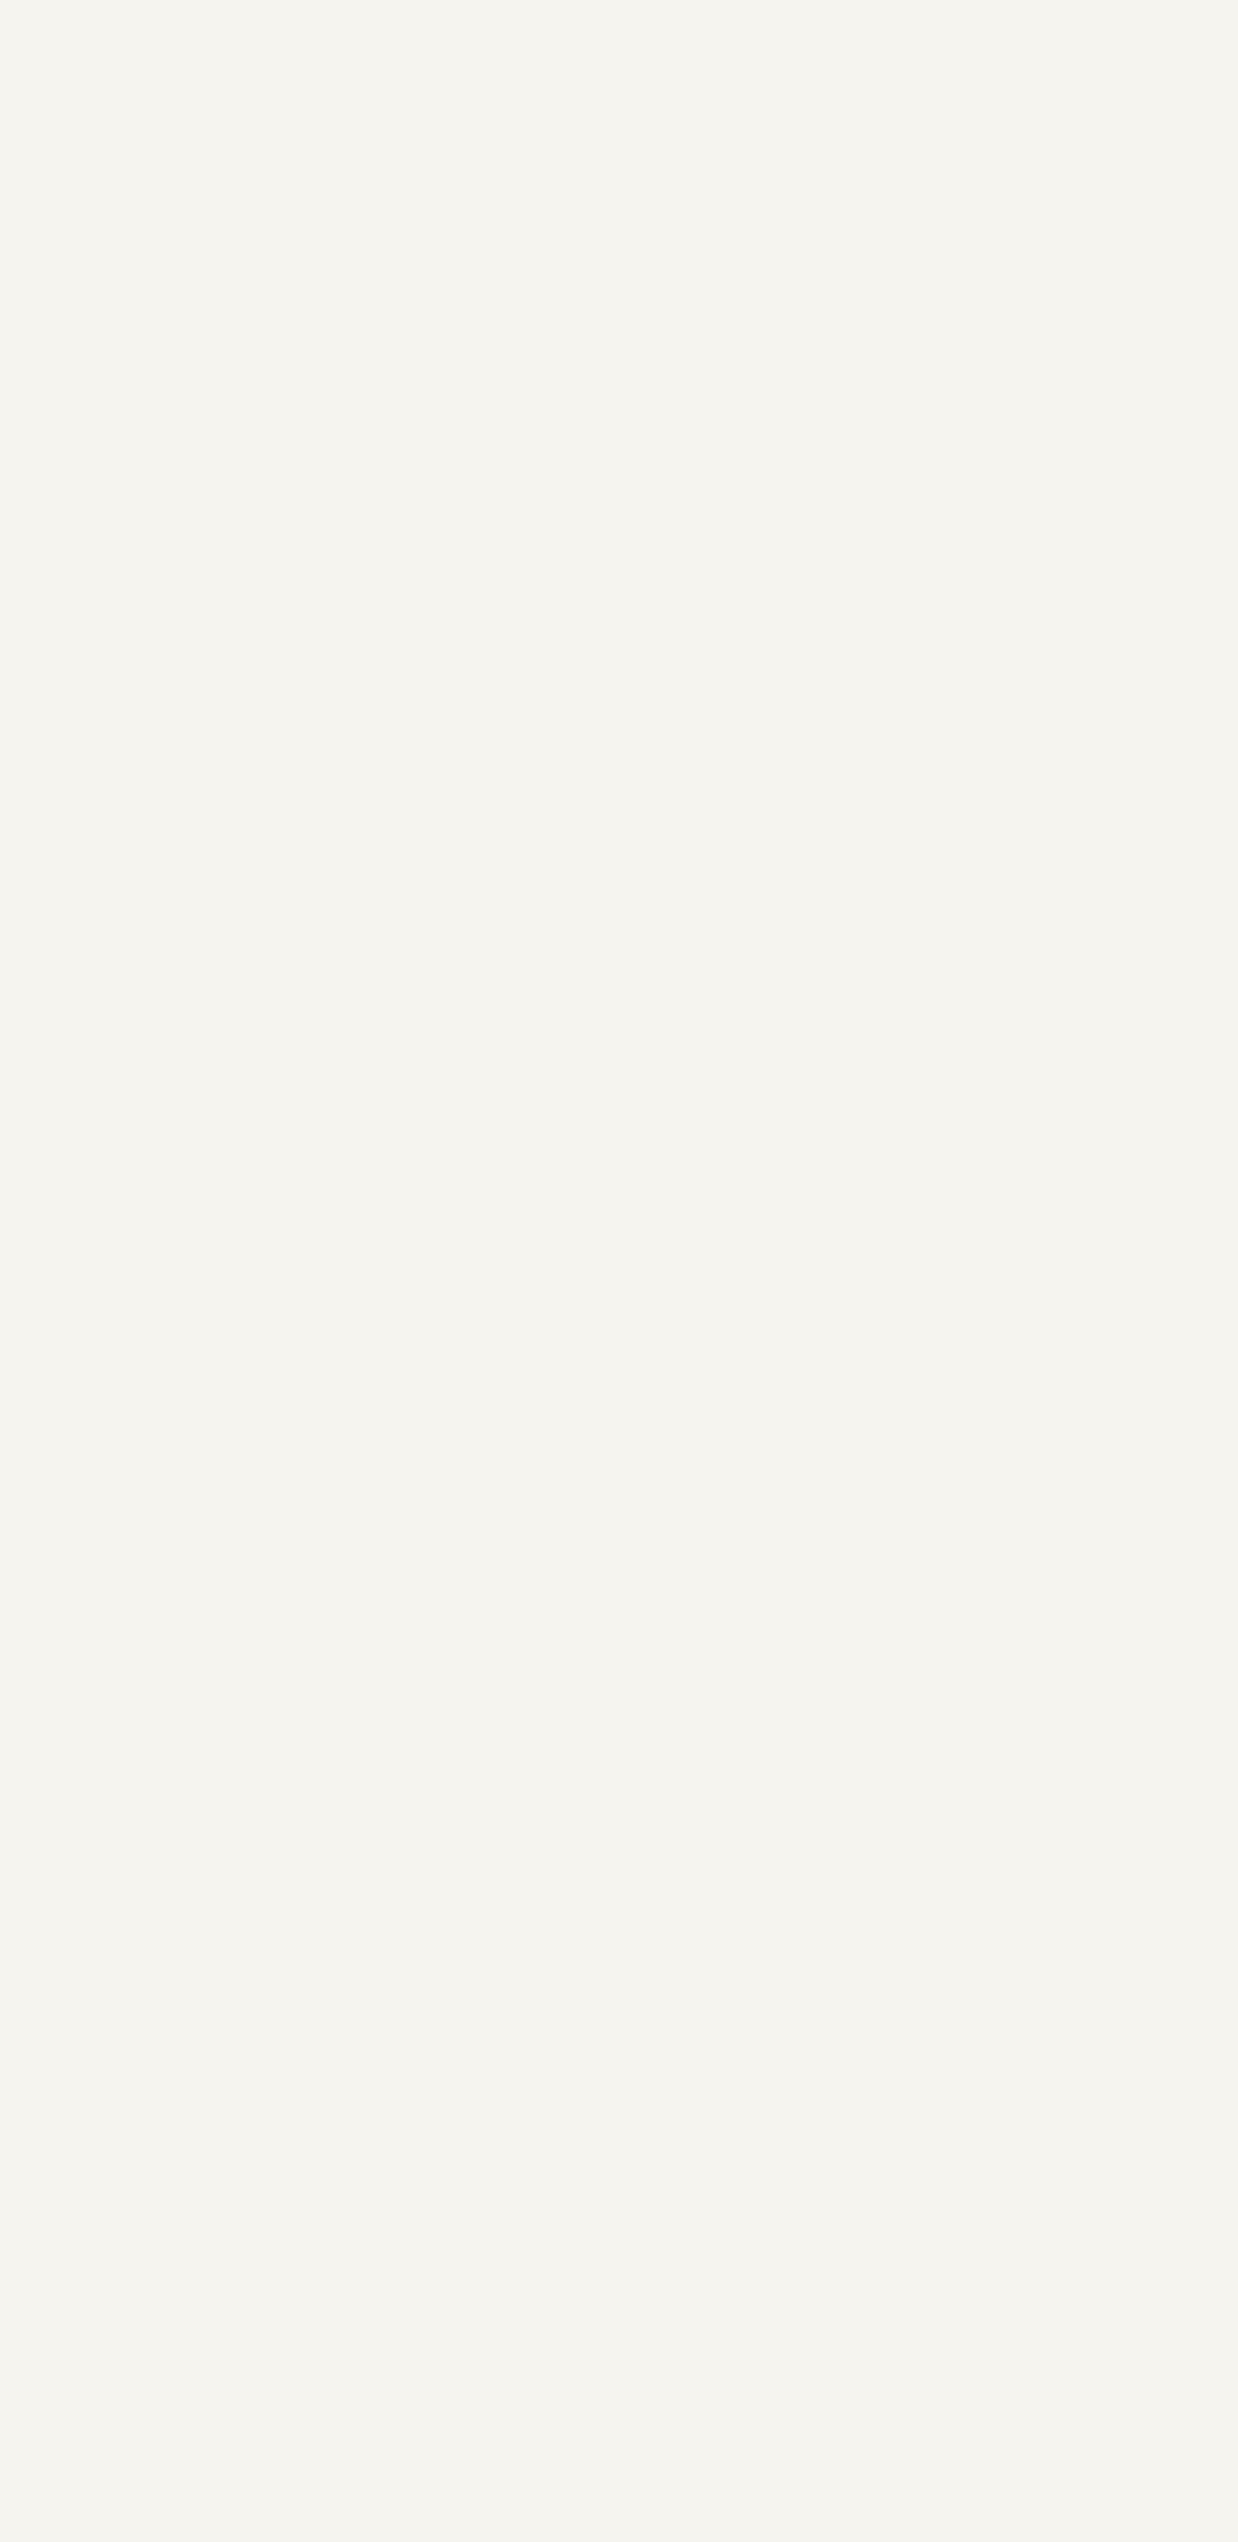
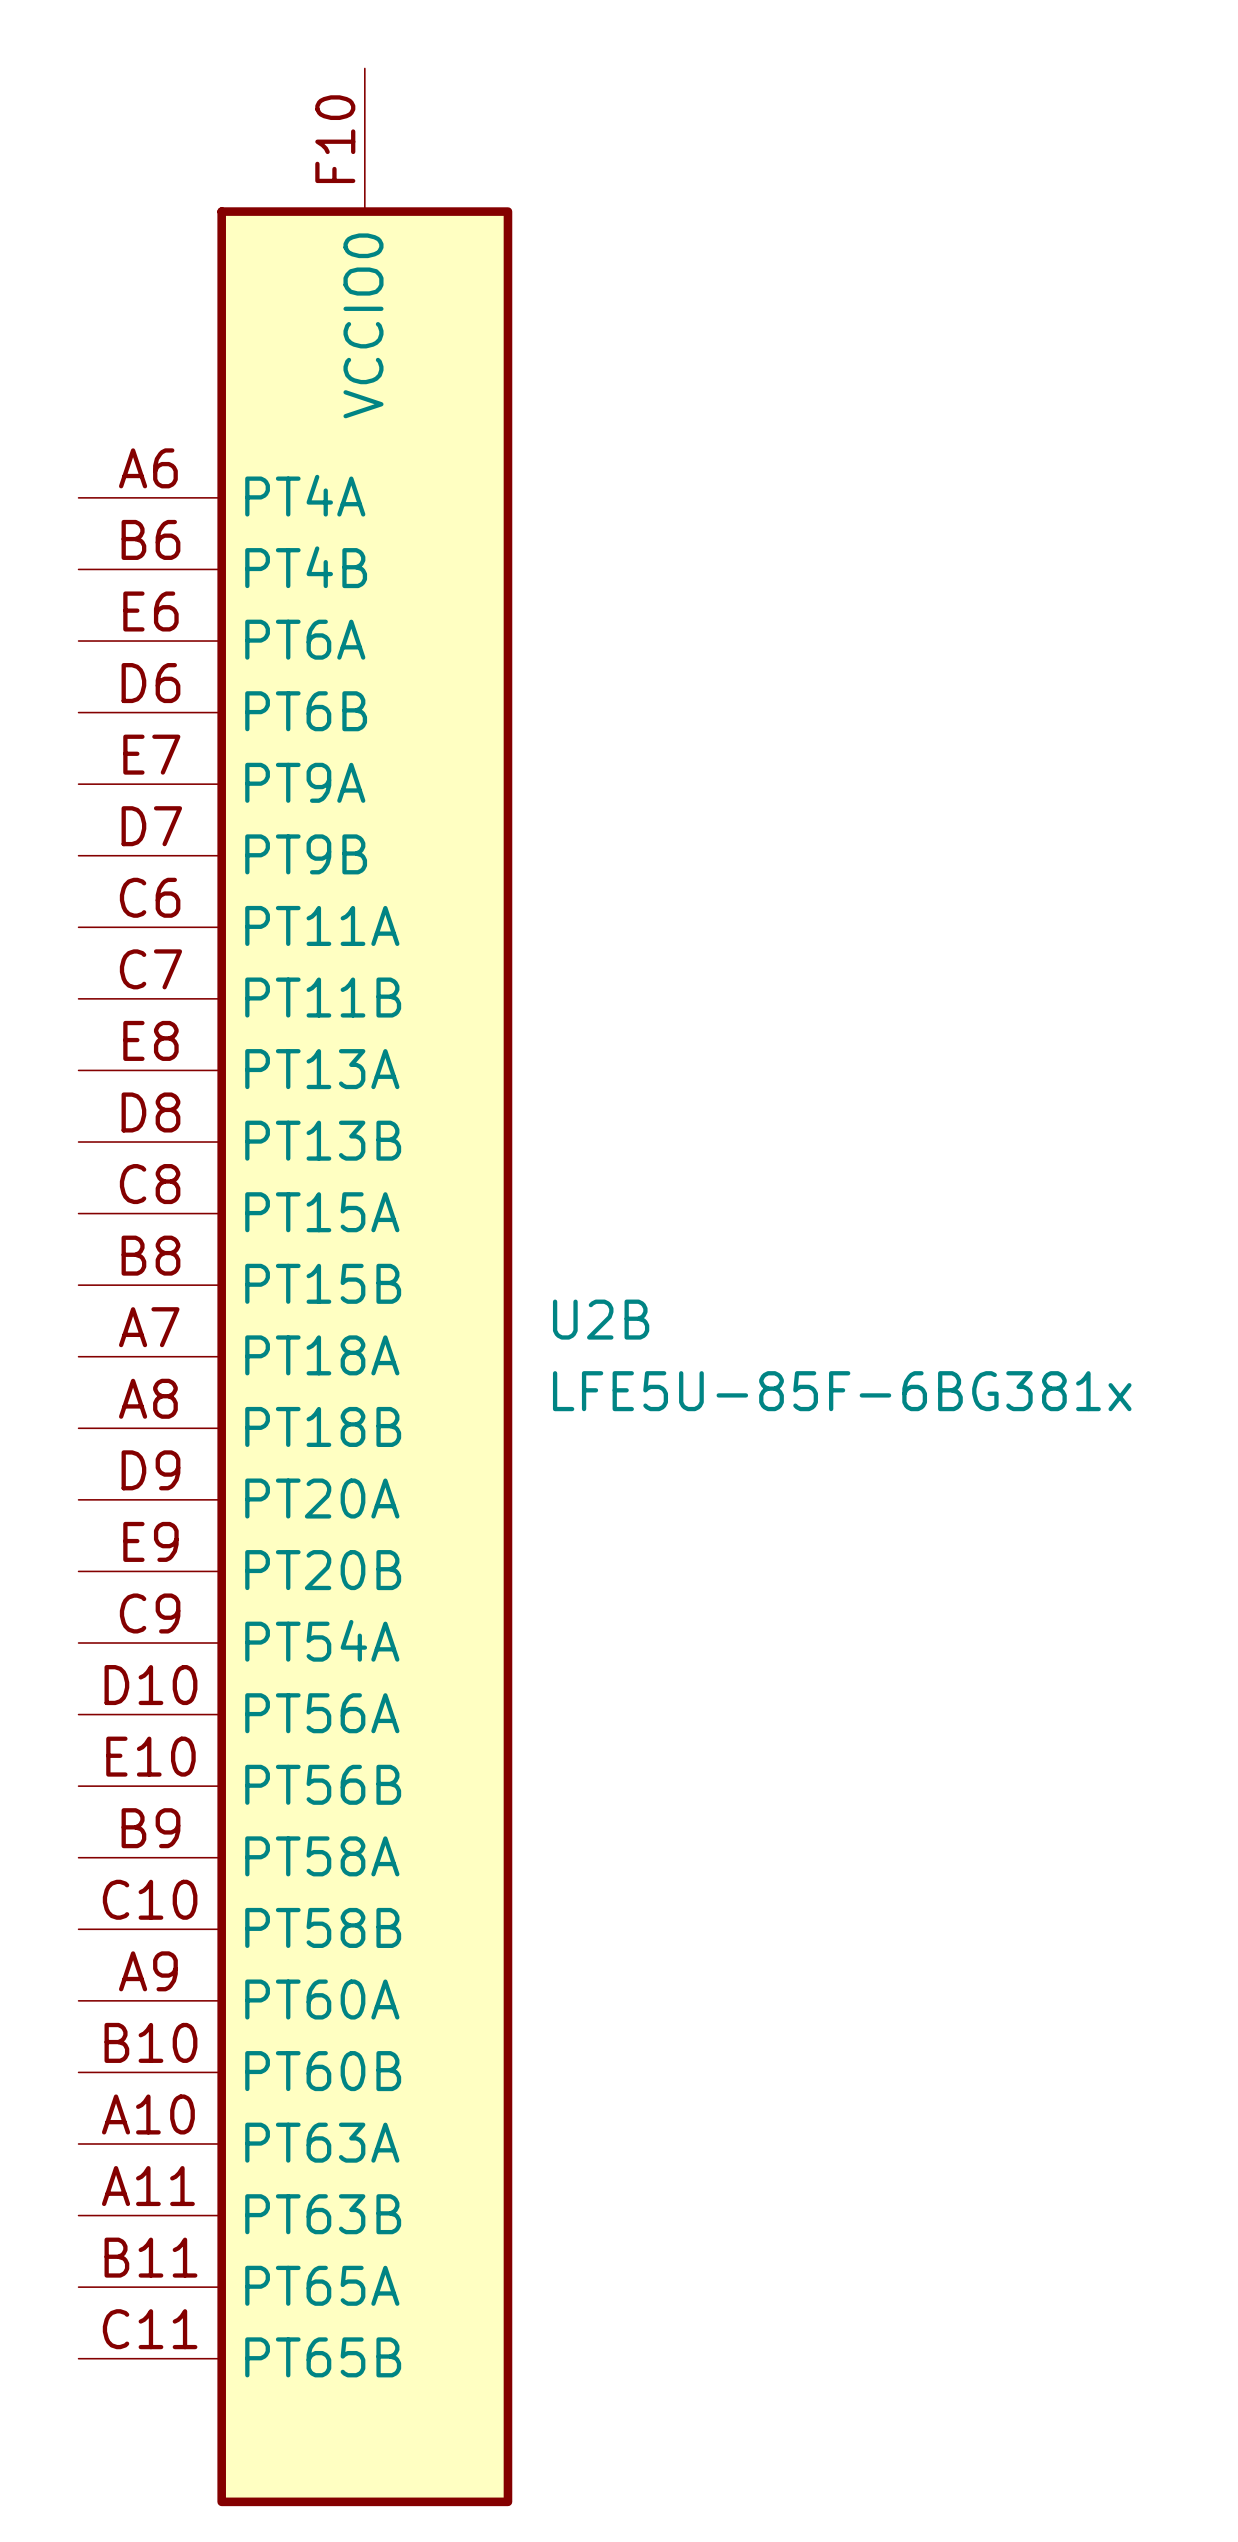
U2B: none -> LFE5U-85F-6BG381x (295, 1287)

